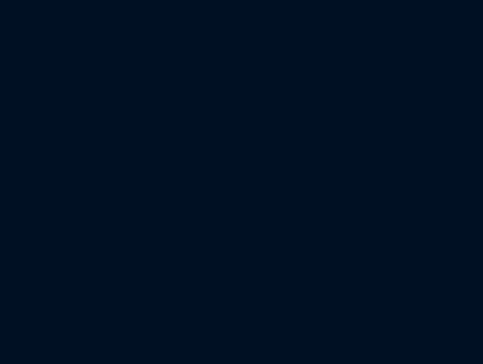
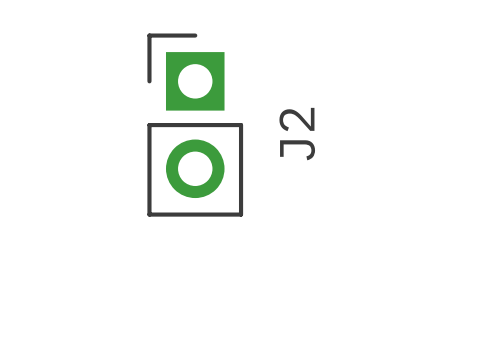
J2: none -> (195, 125)

